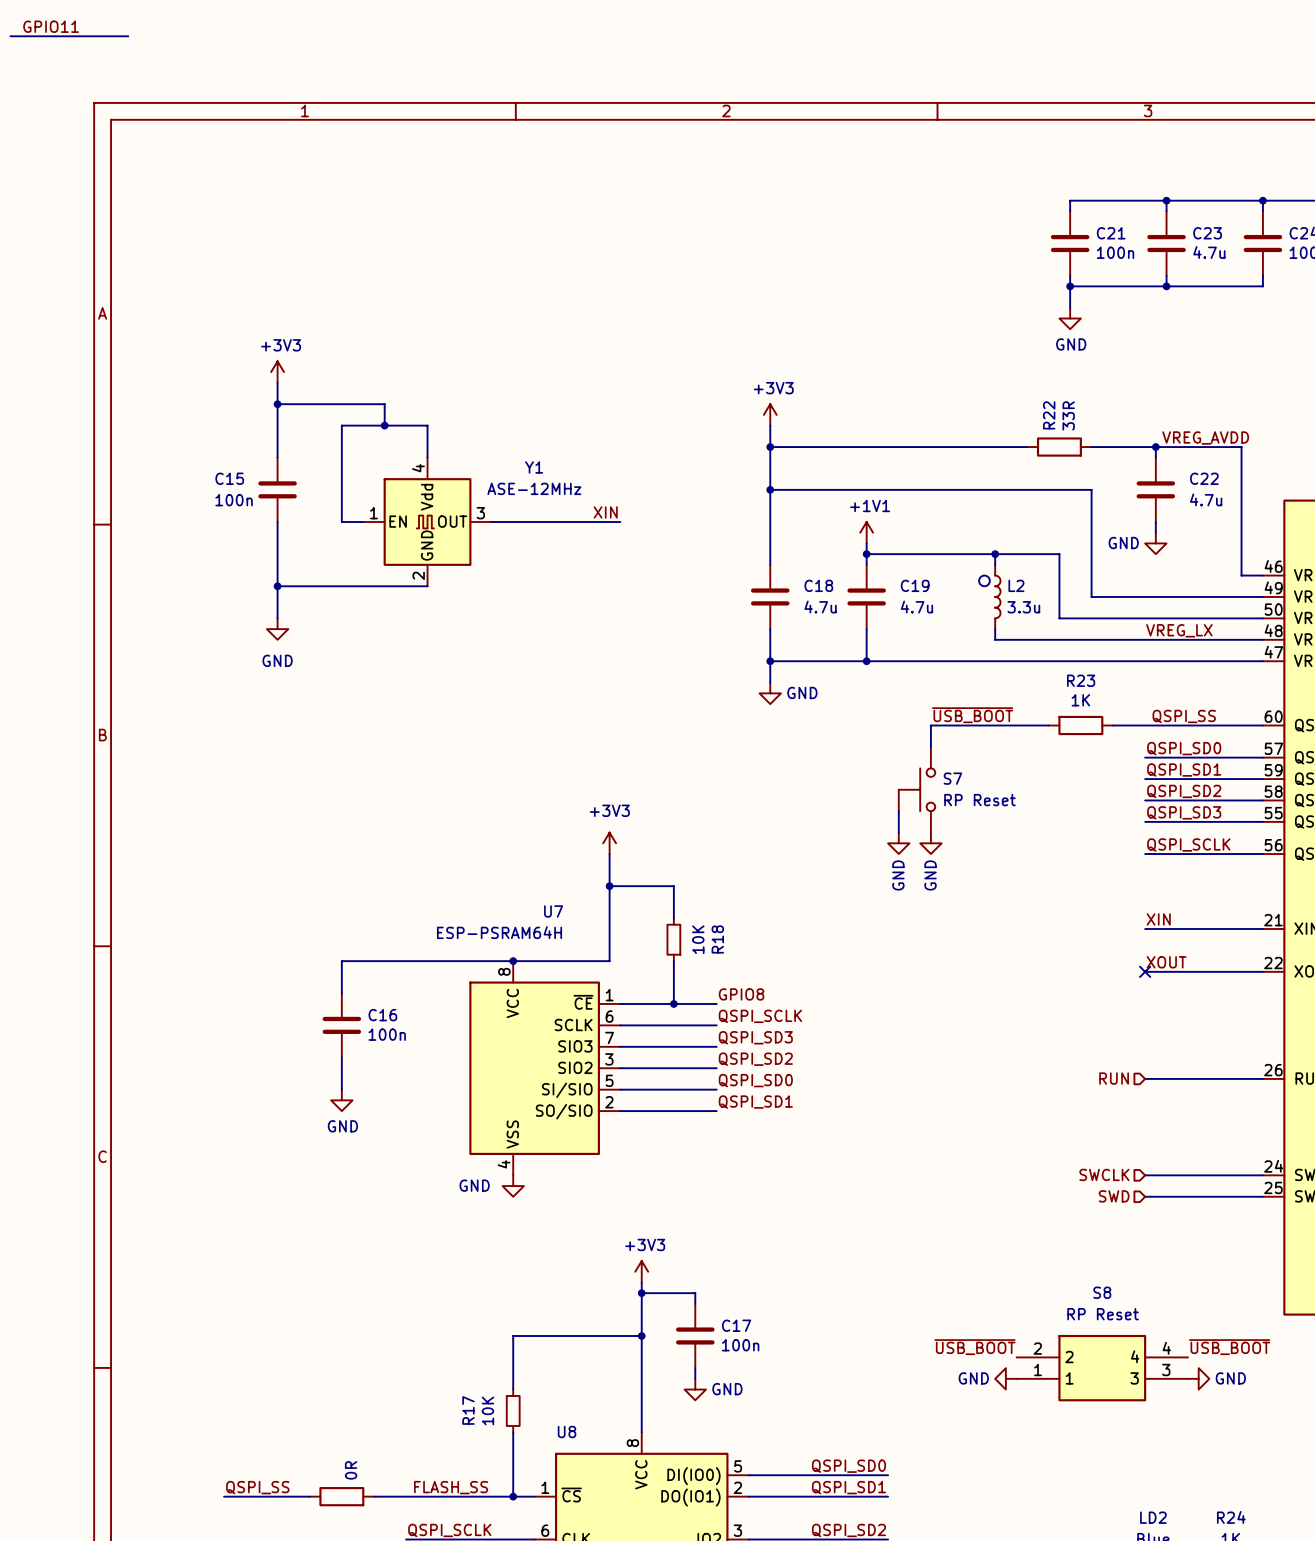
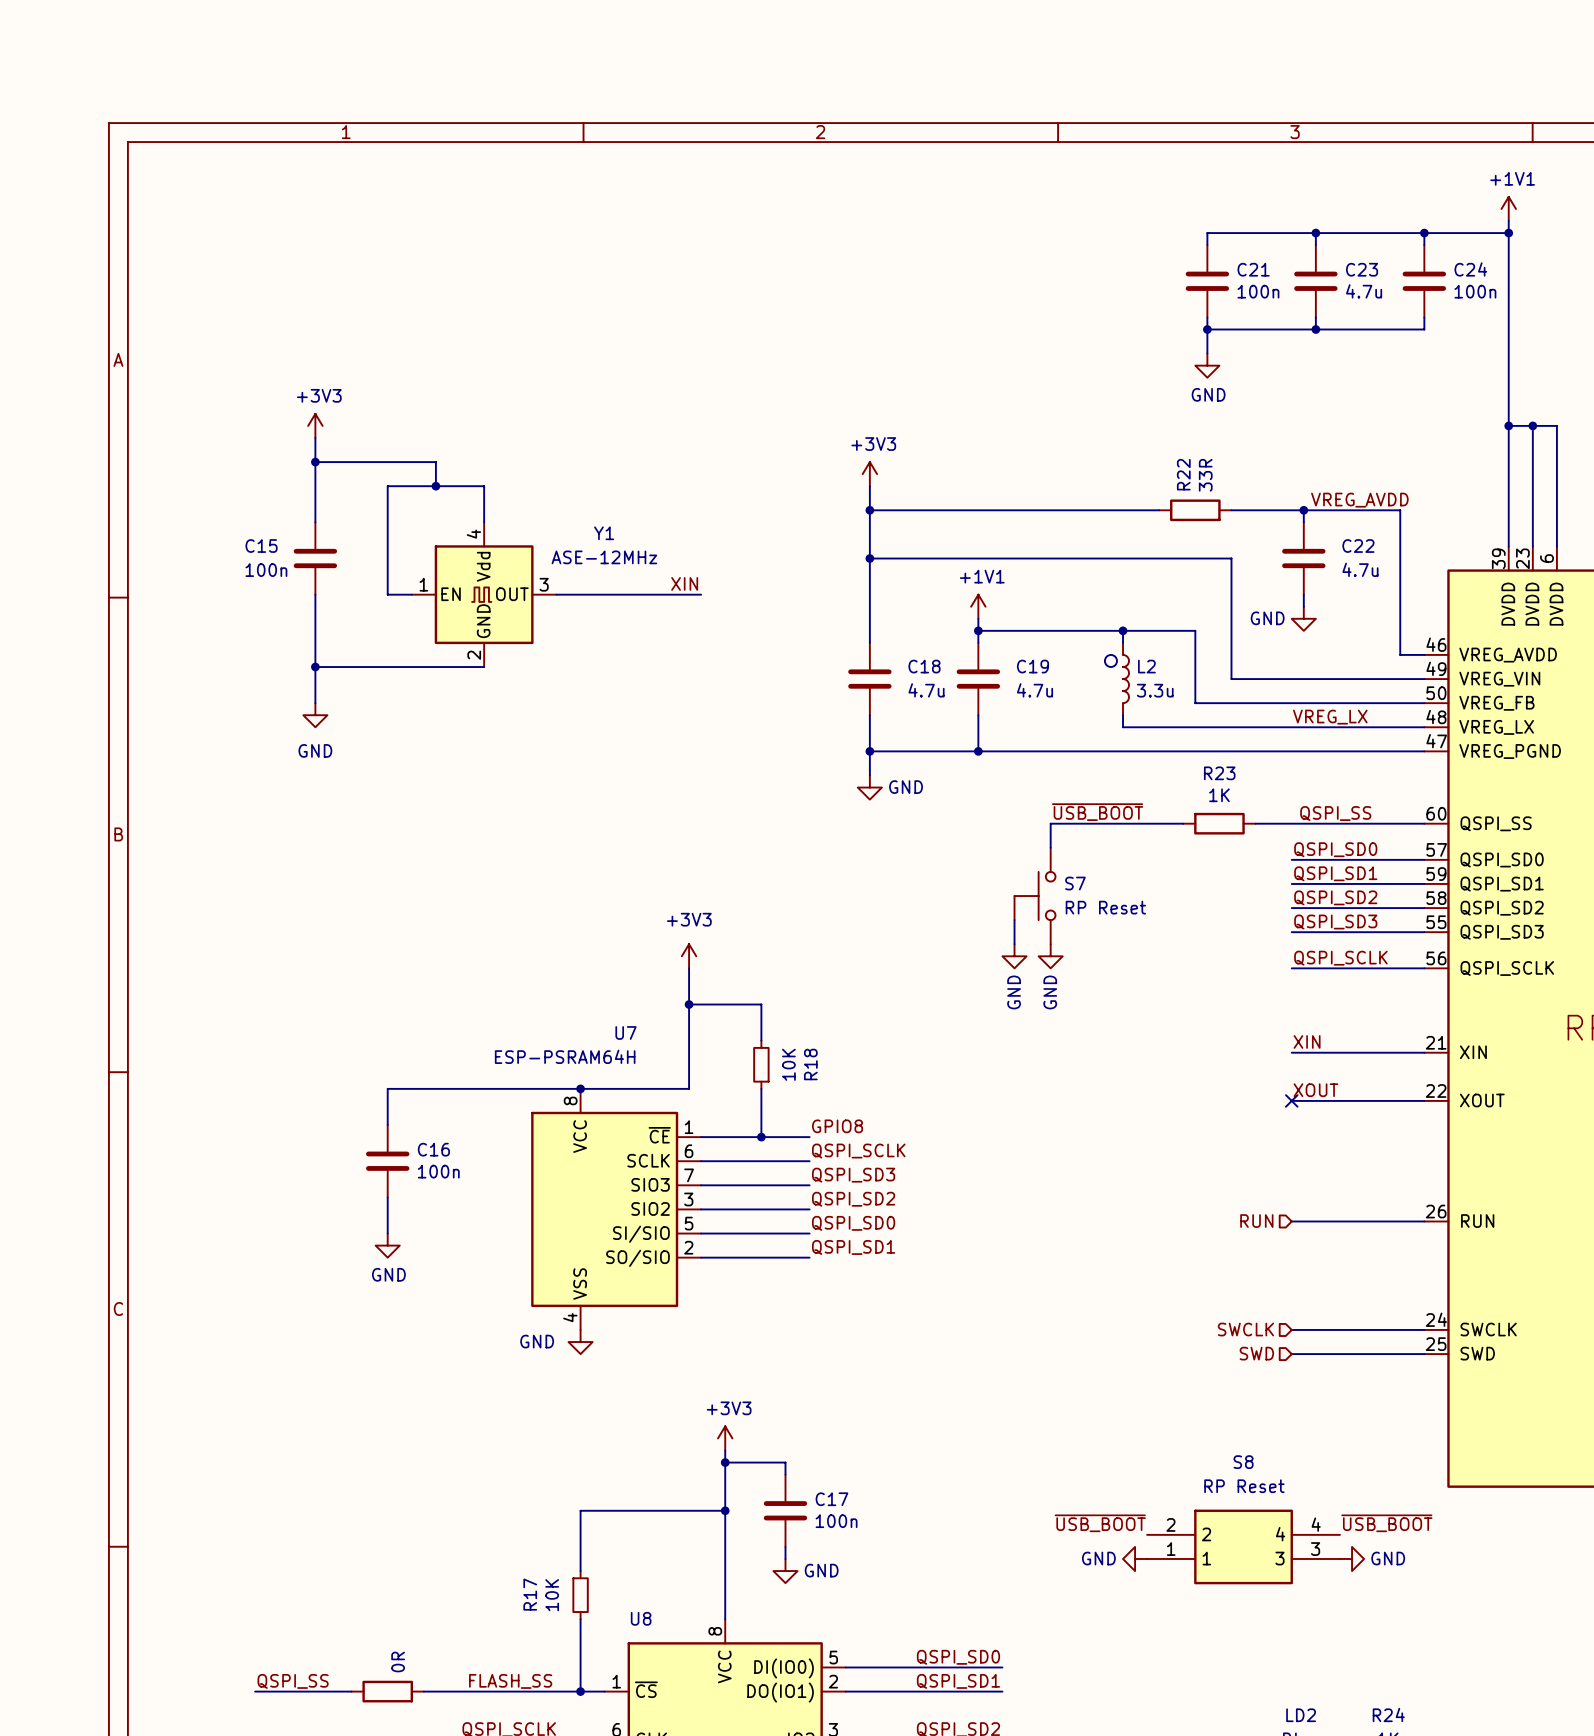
label: GPIO11 (51, 26) -> none
wire: (10, 36) (128, 36) -> none

